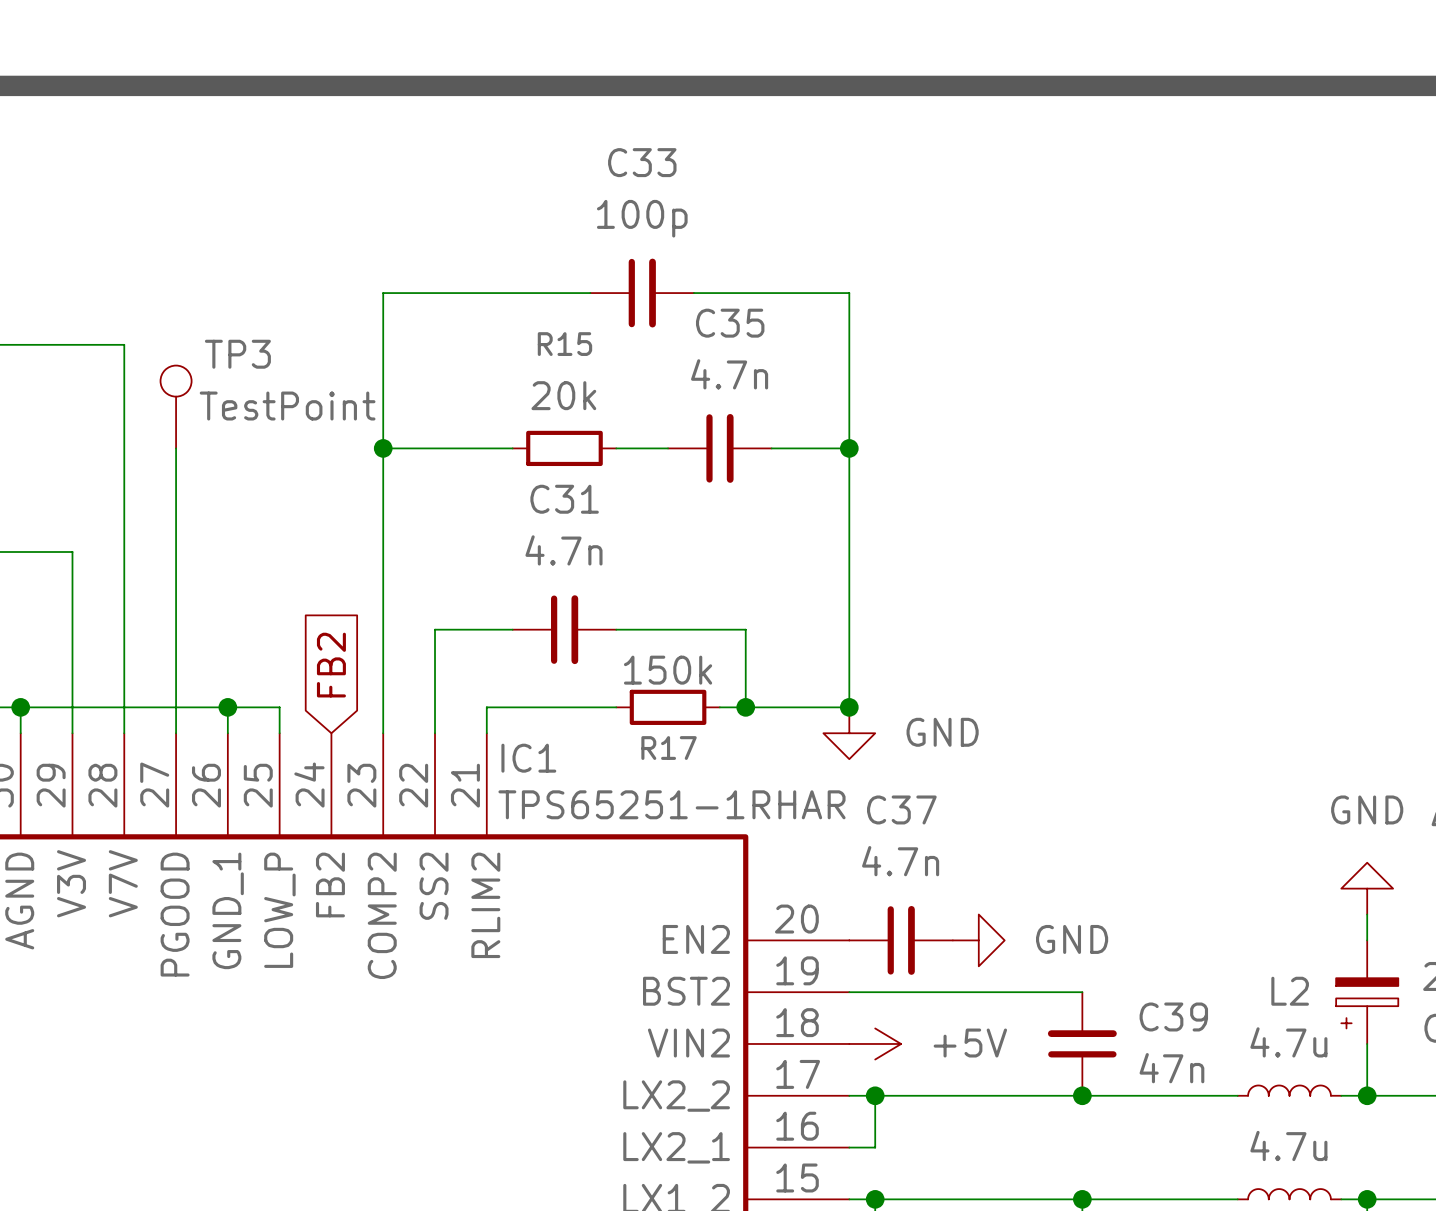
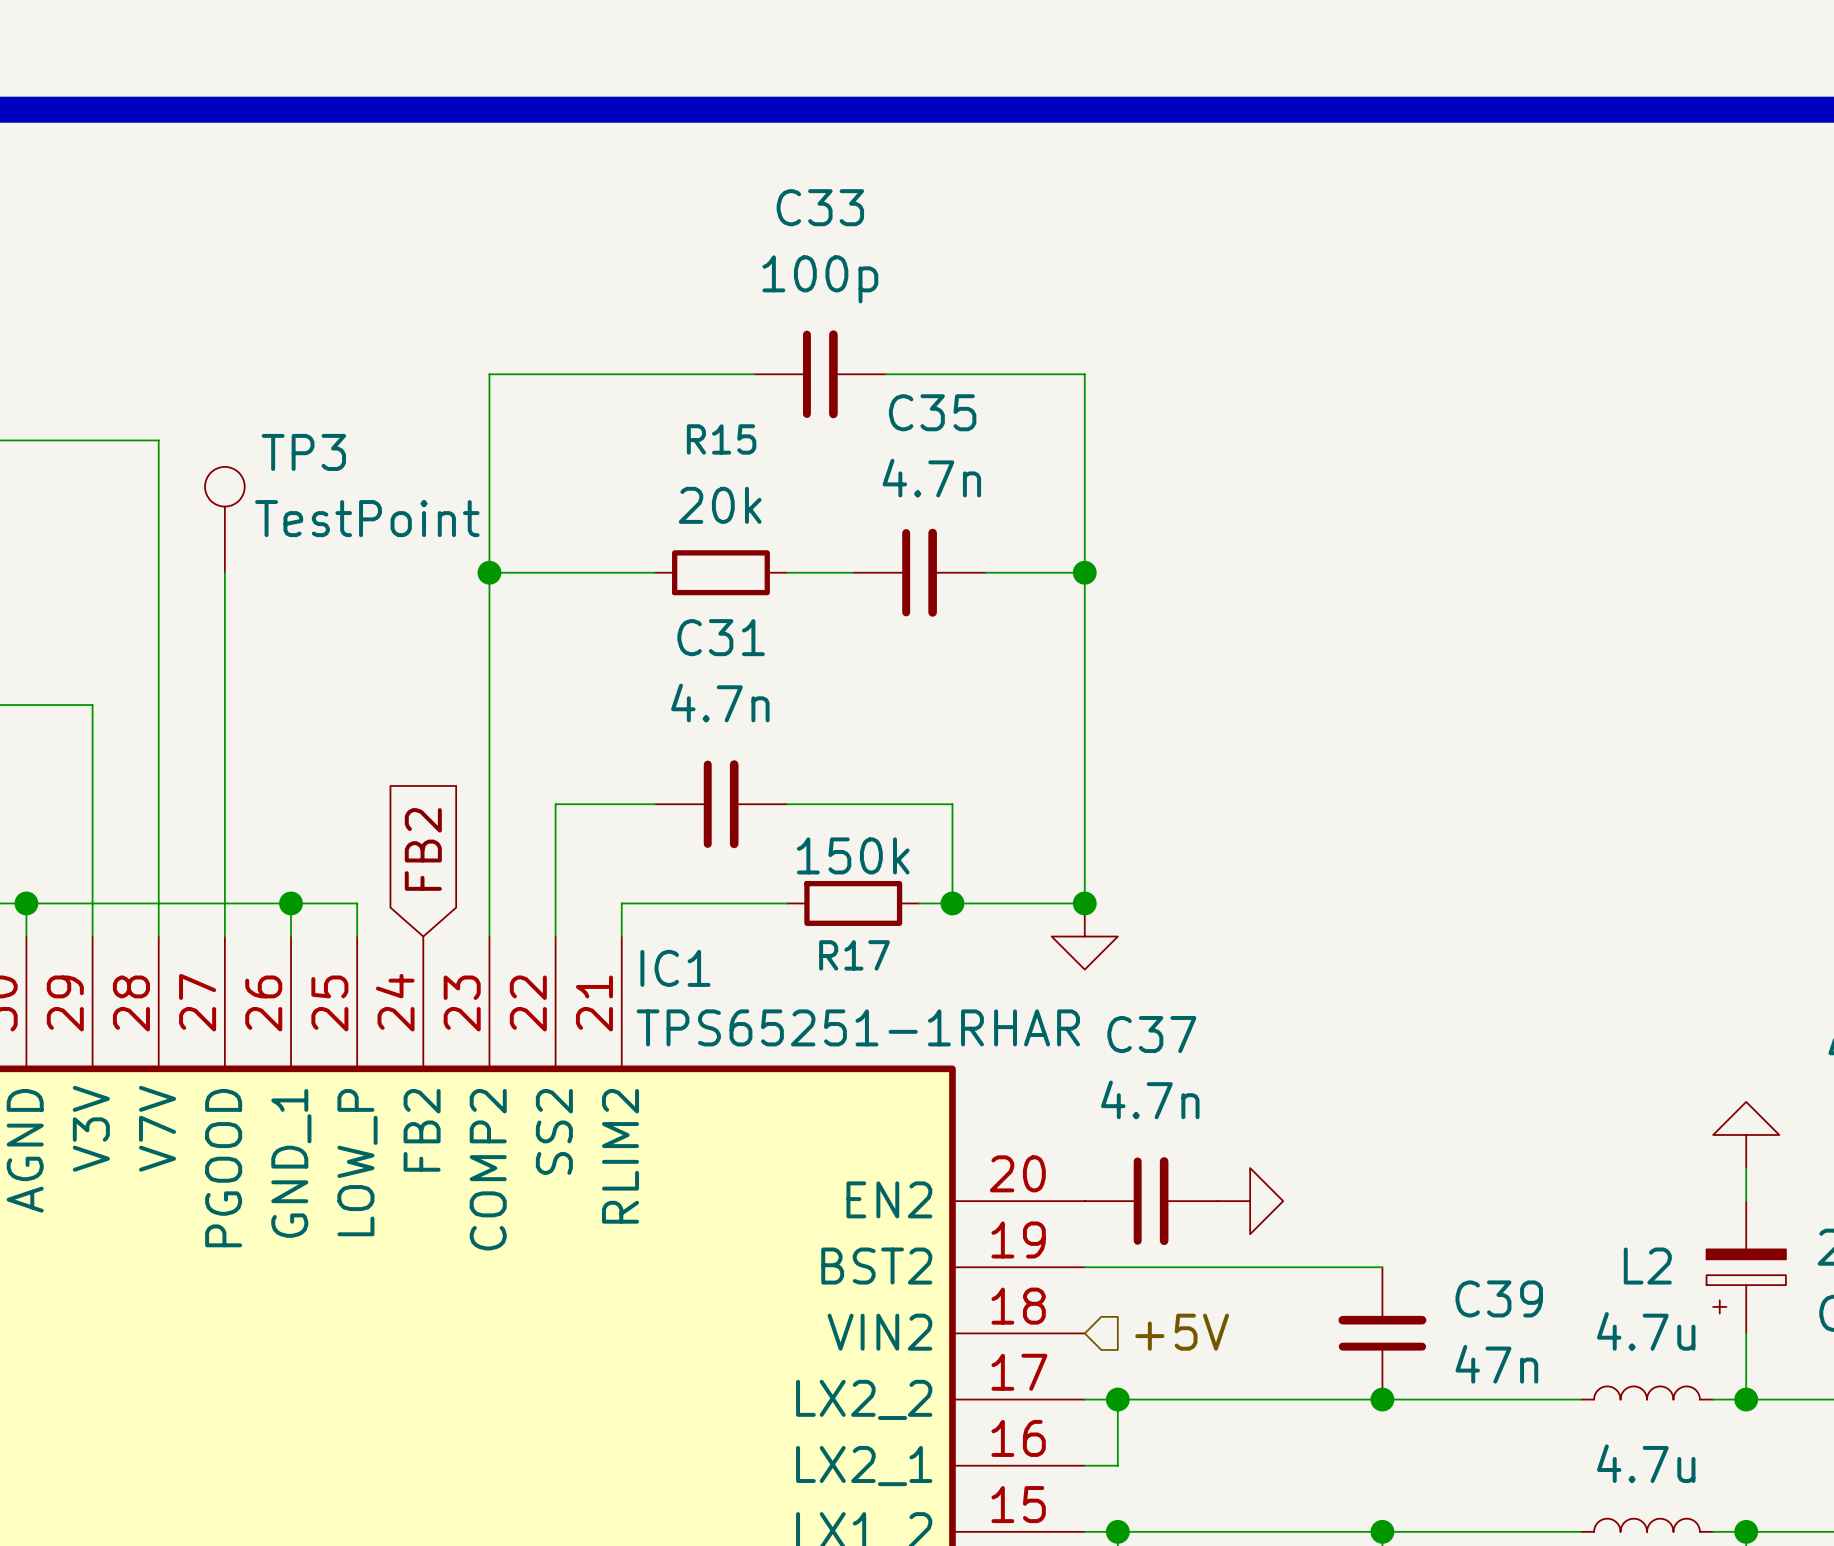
power symbol text: GND (942, 732) -> none
power symbol text: GND (1367, 809) -> none
power symbol text: GND (1072, 939) -> none
power symbol: +5V (875, 1043) -> none
hierarchical label: none -> +5V (1182, 1332)

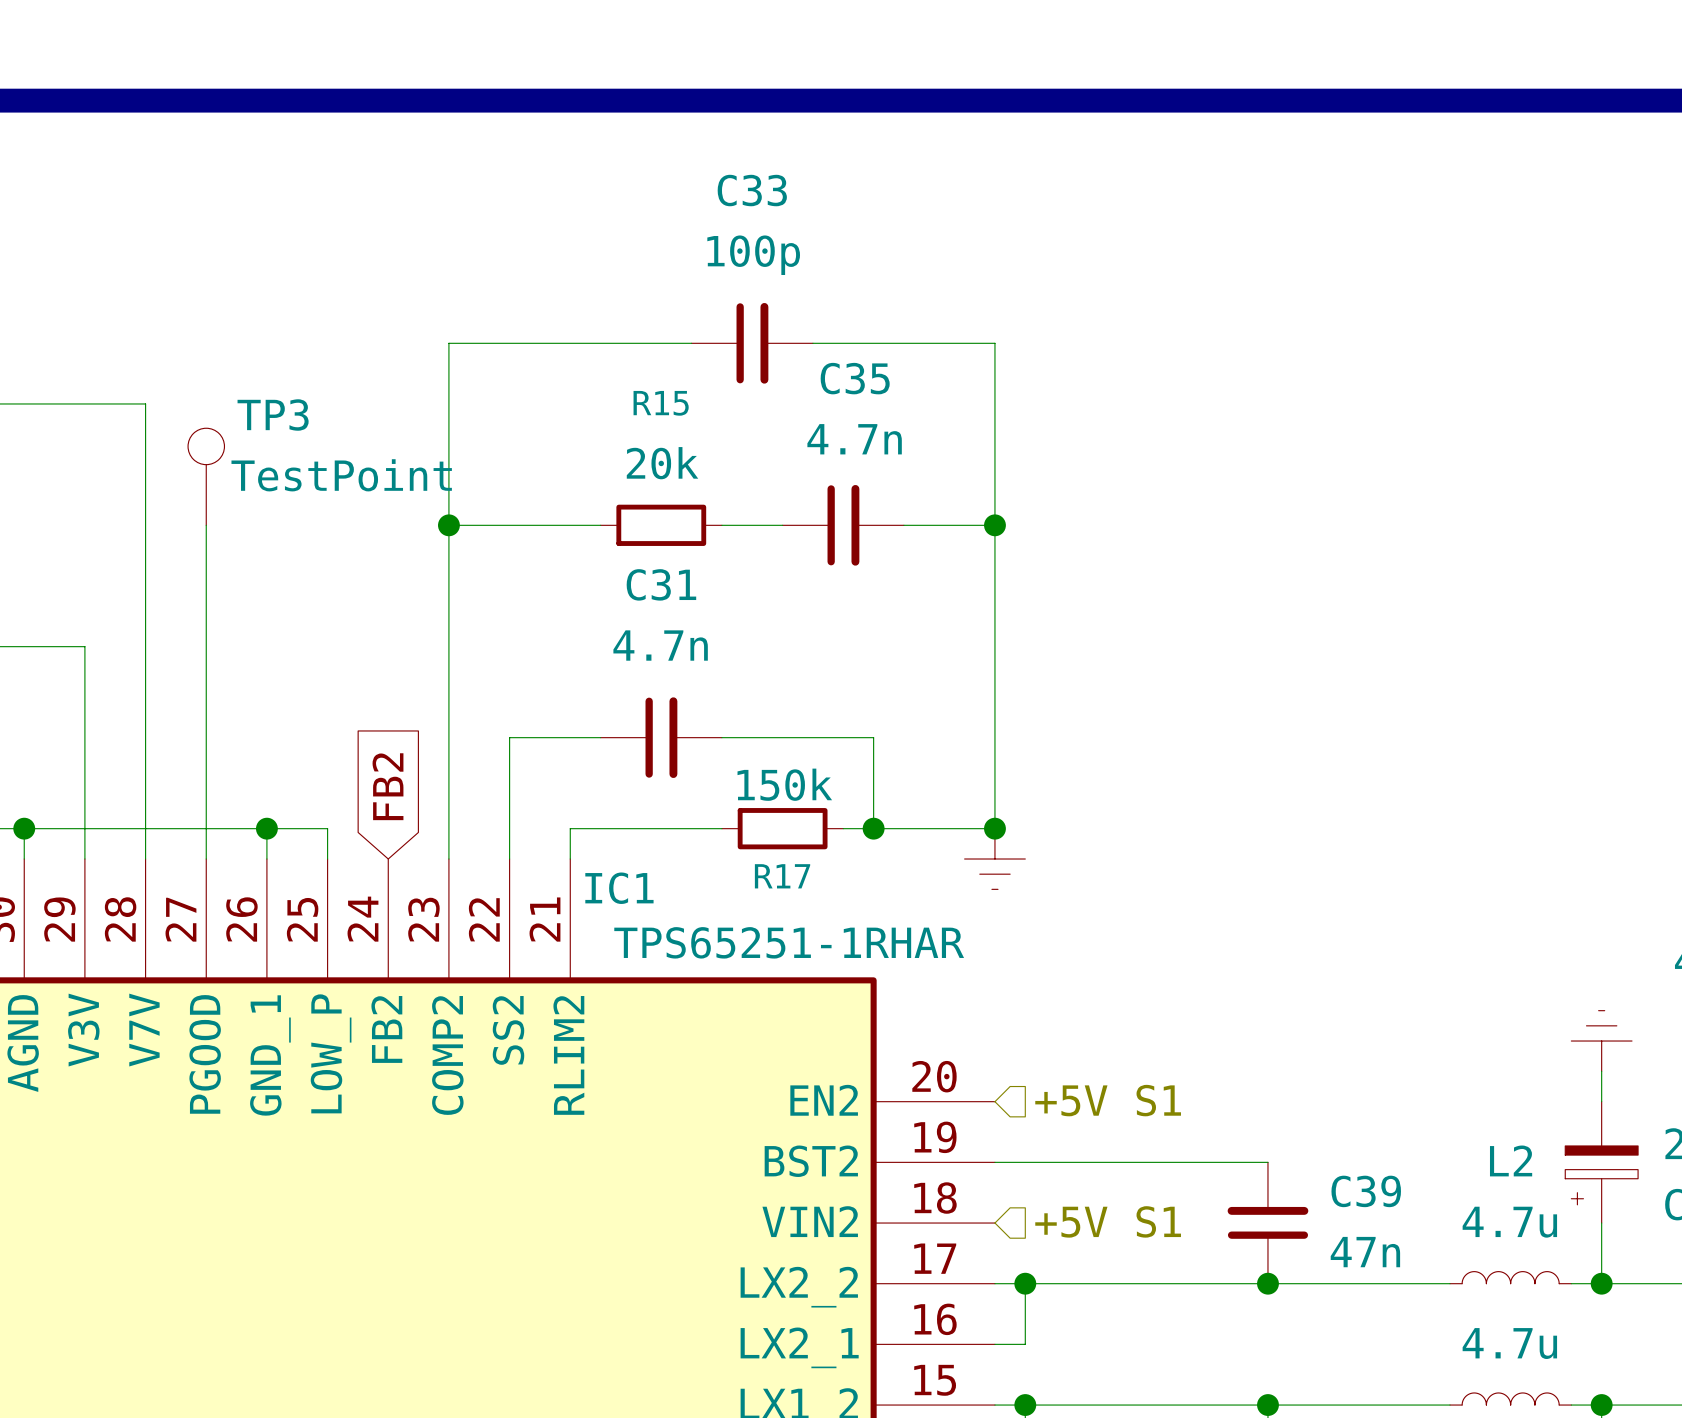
power symbol shape: [1051, 903, 1118, 970] -> [964, 828, 1026, 890]
power symbol shape: [1713, 1101, 1780, 1169] -> [1571, 1010, 1633, 1072]
hierarchical label: none -> +5V S1 (1108, 1100)
C37: 4.7n (1150, 1201) -> none
power symbol: (1250, 1201) -> none
hierarchical label: +5V (1182, 1332) -> +5V S1 (1108, 1221)

